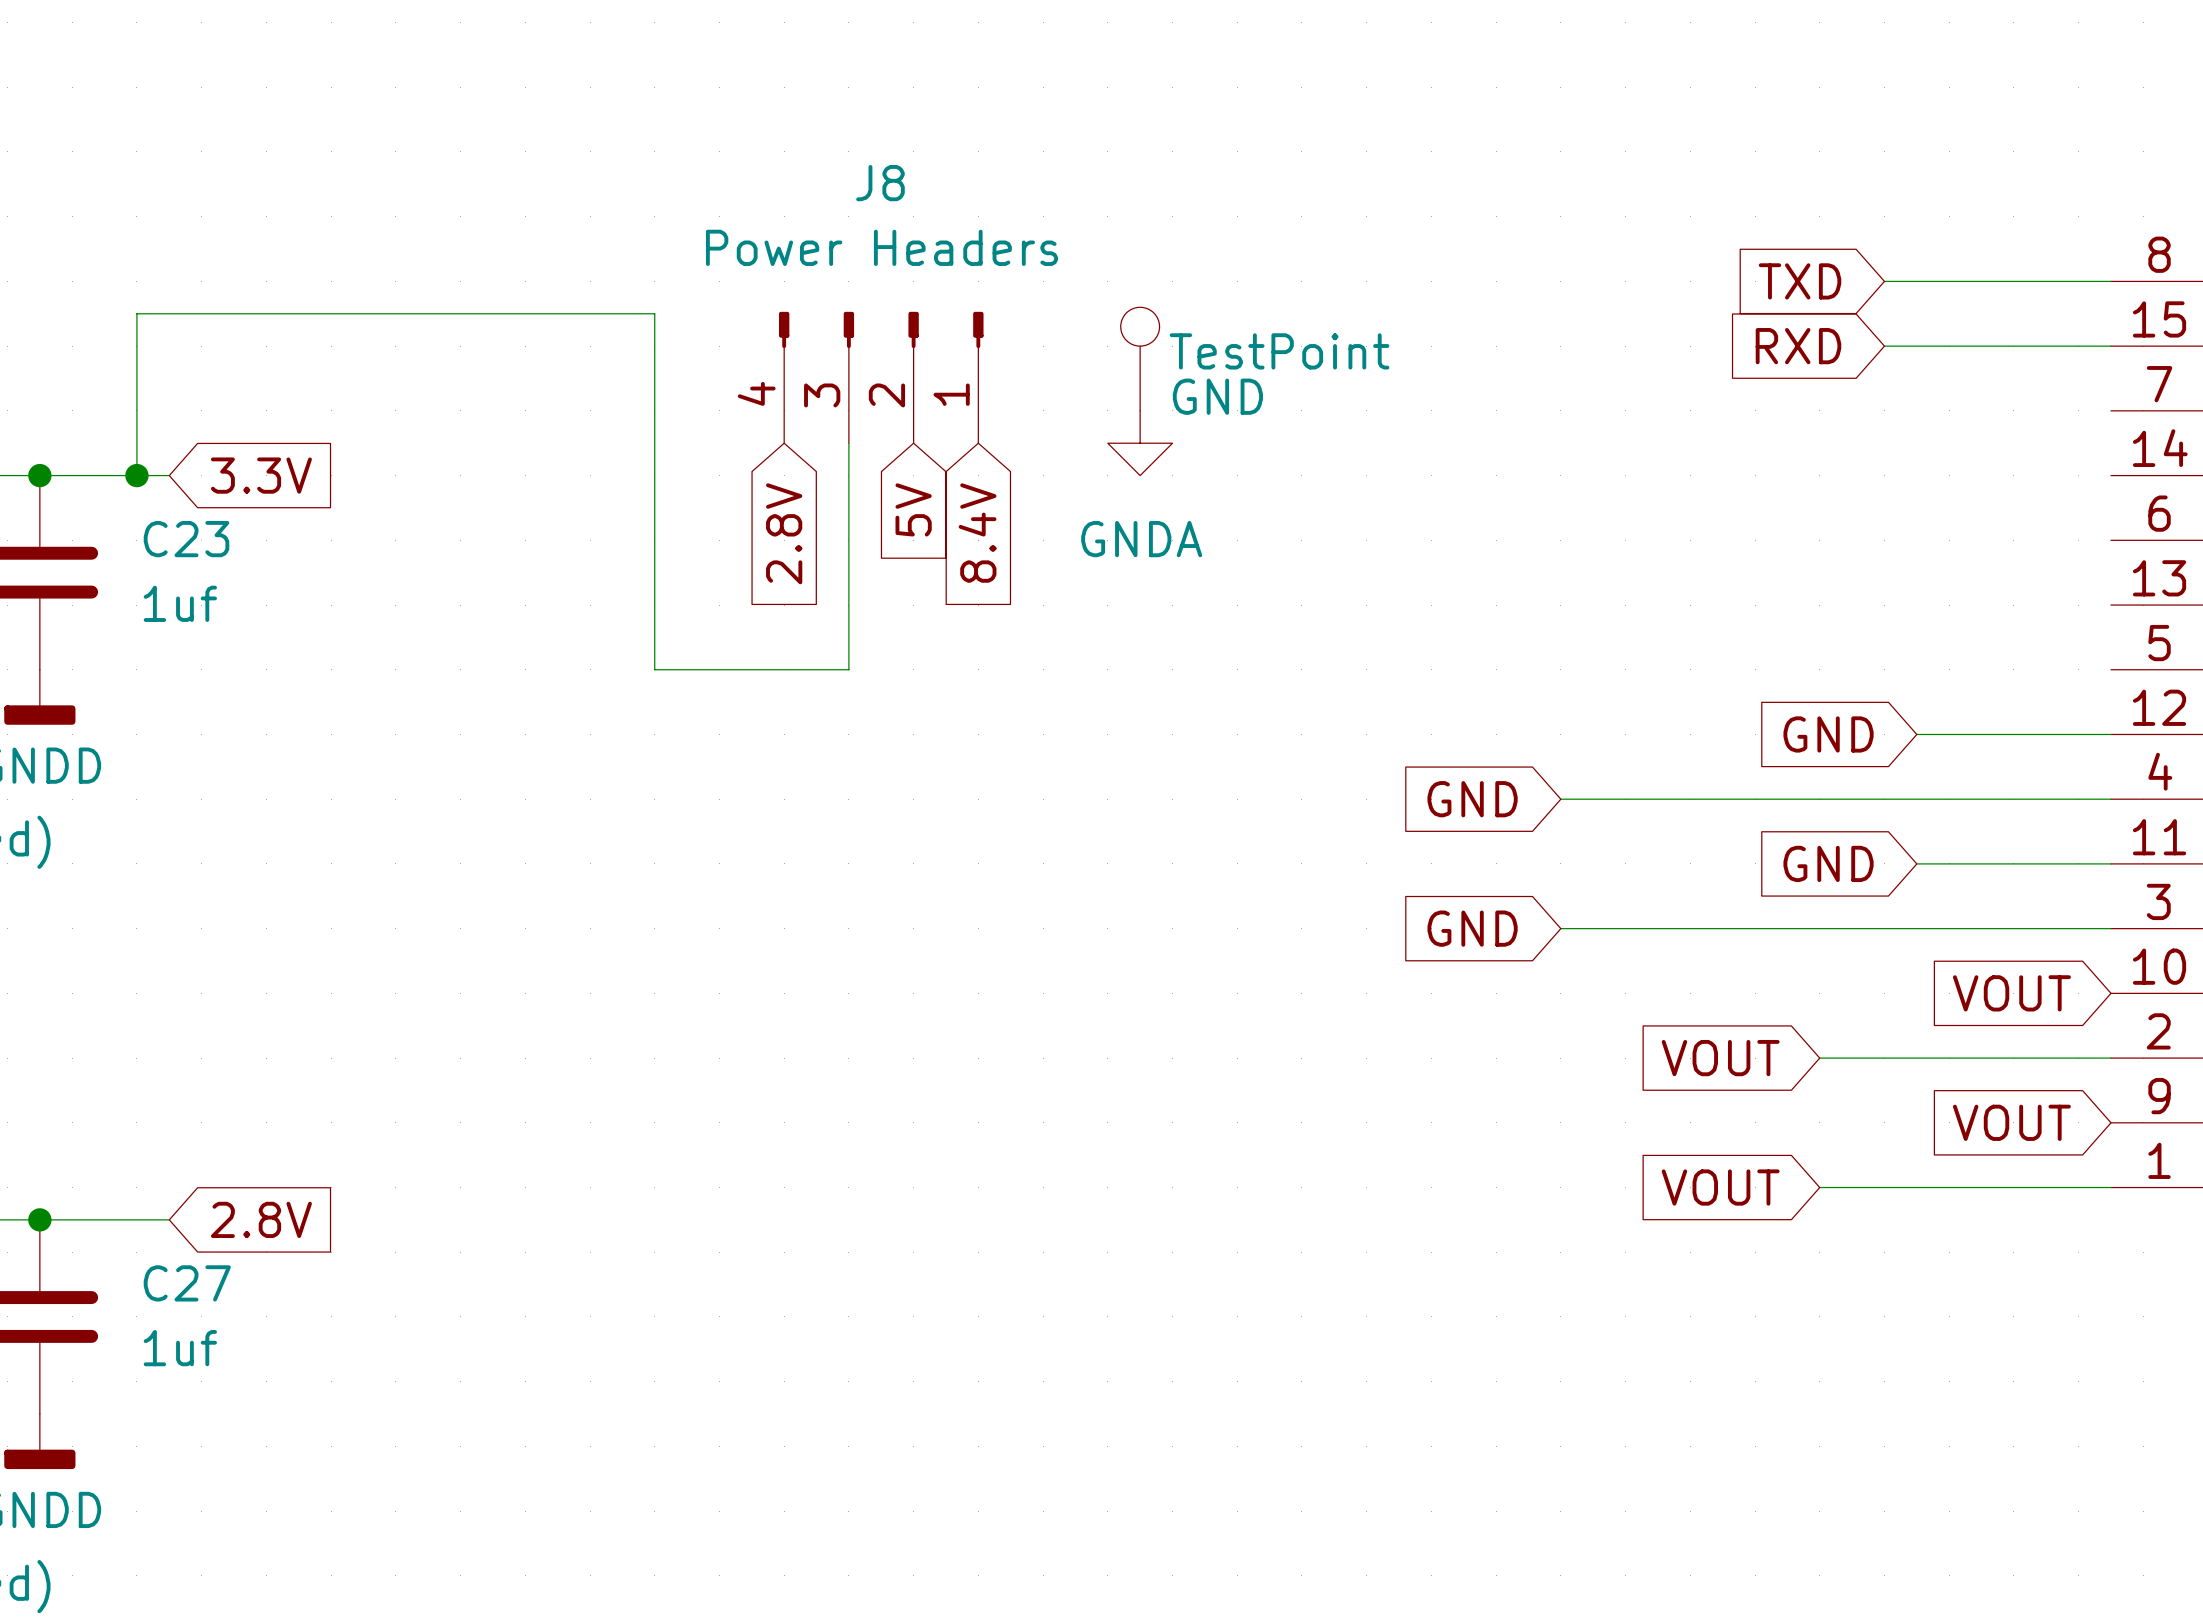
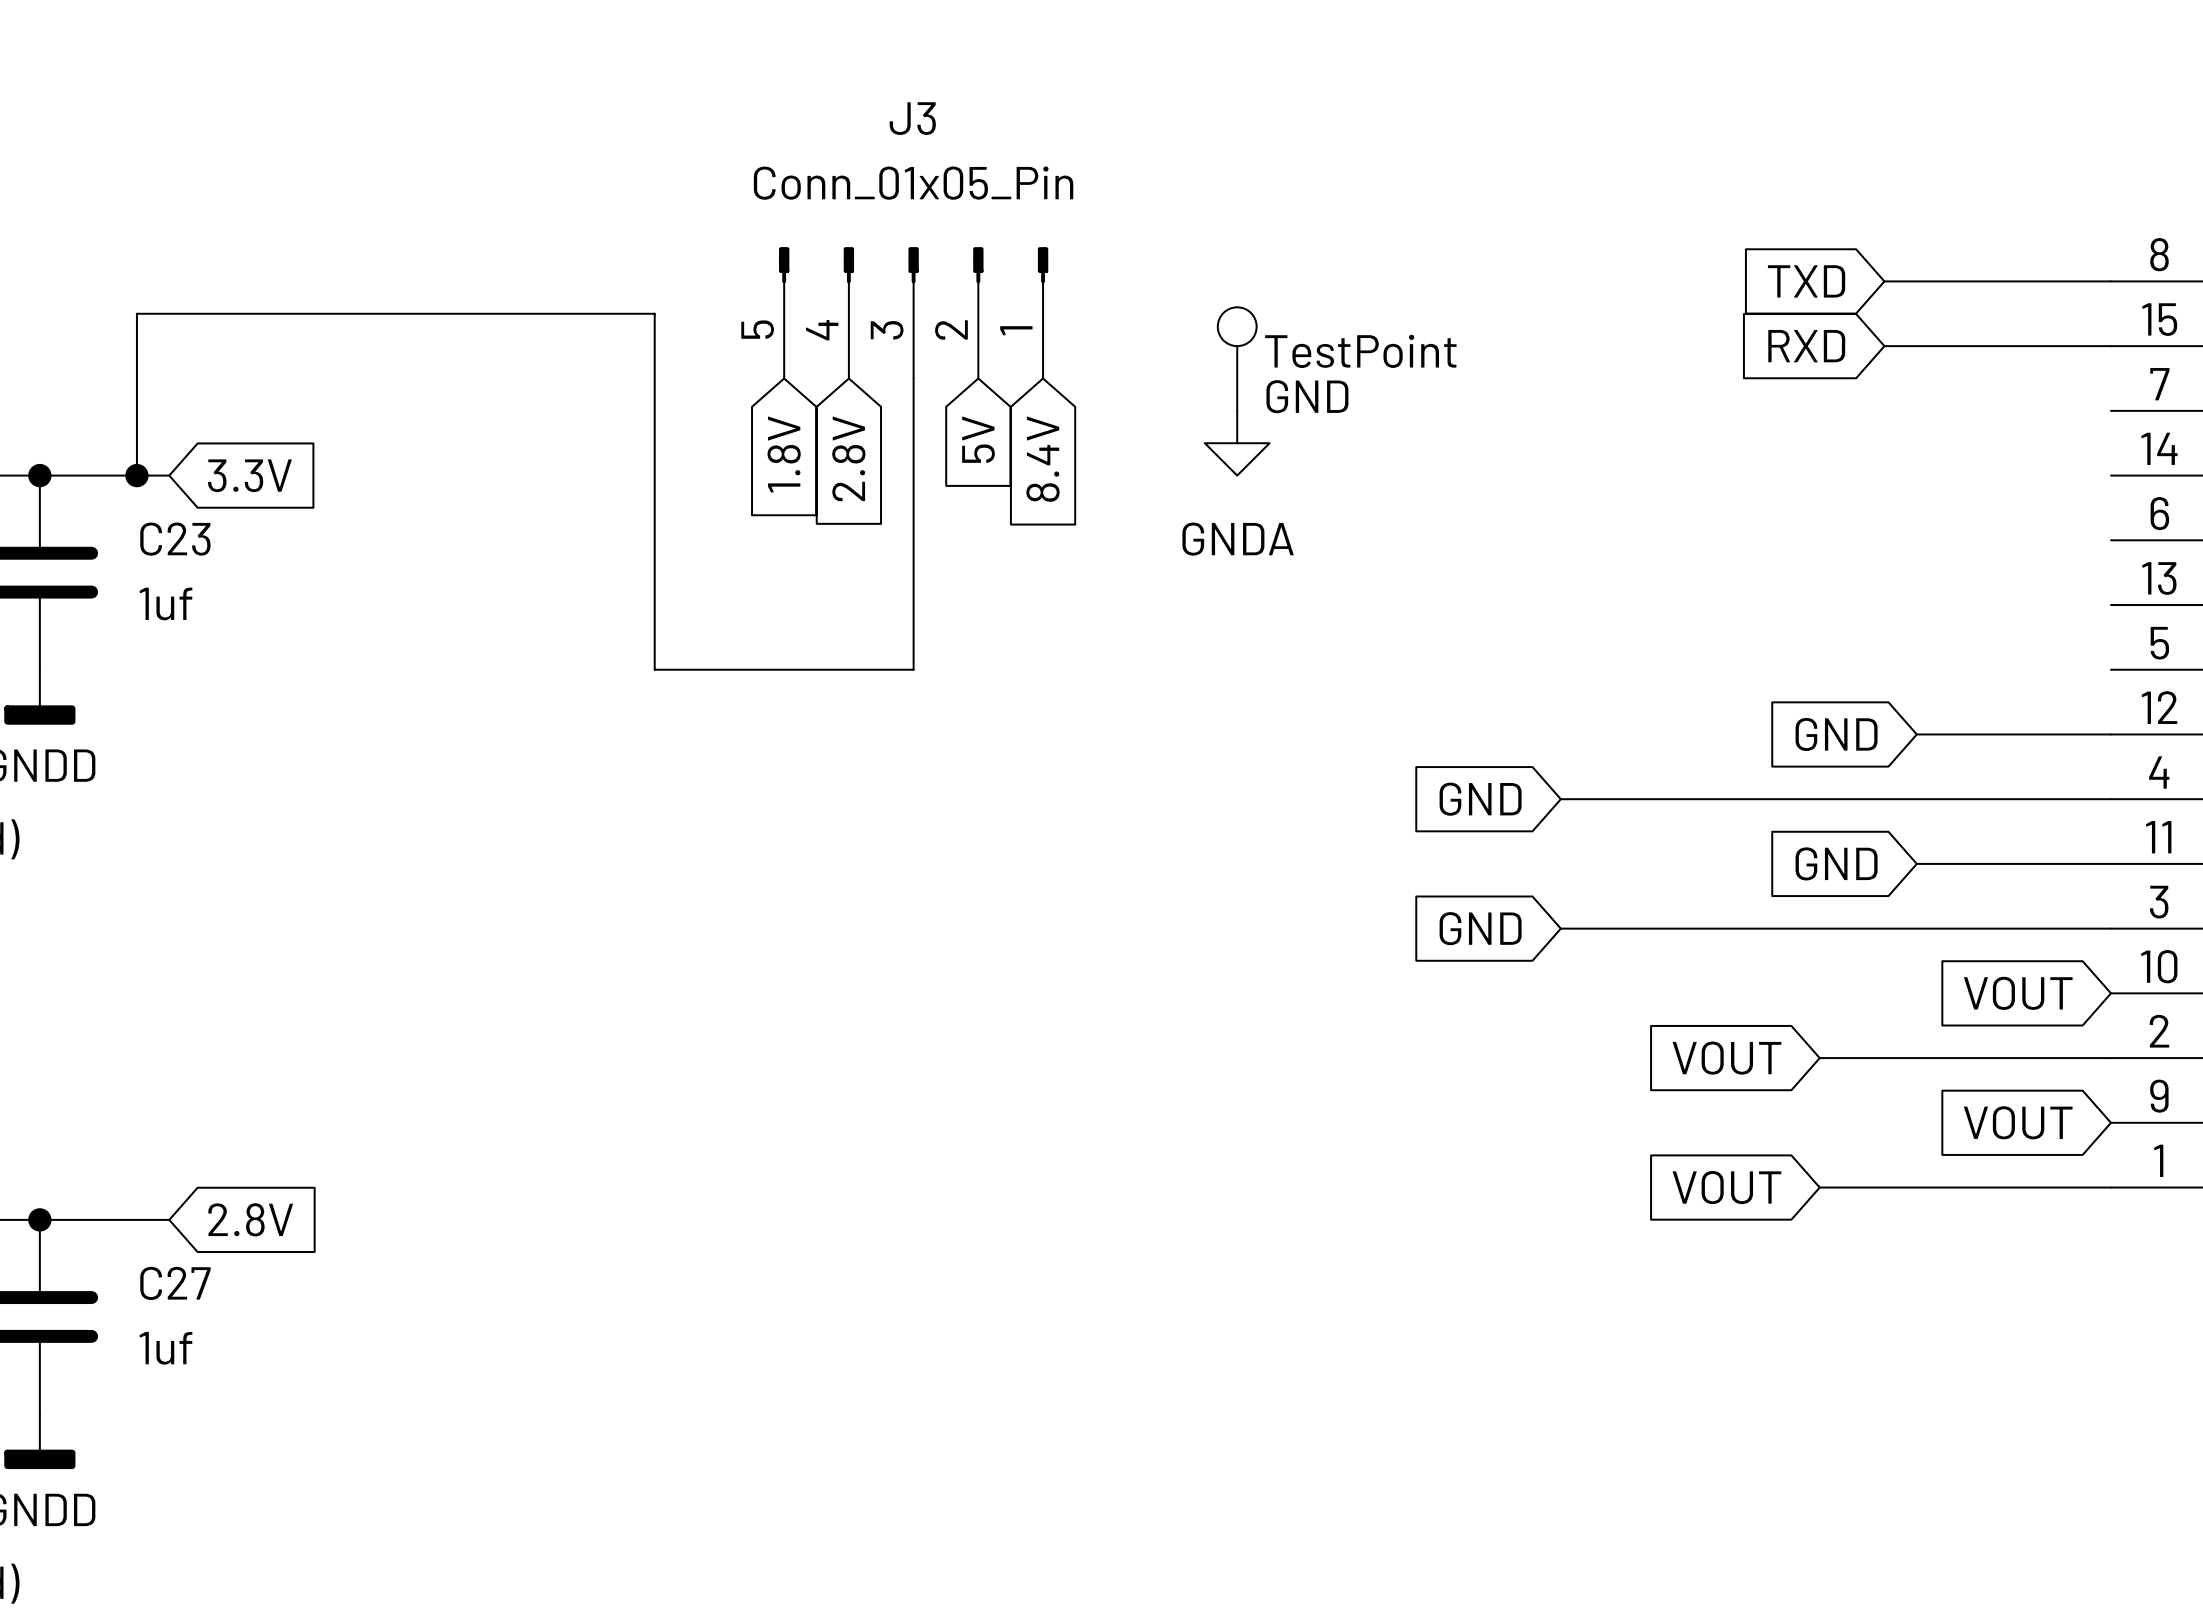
J3: none -> Conn_01x05_Pin (913, 312)
TestPoint position: (1140, 359) -> (1237, 359)
J8: Power Headers (881, 377) -> none
wire: (848, 443) (848, 669) -> (913, 378) (913, 669) (848, 669)
power symbol position: GNDA (1140, 443) -> GNDA (1237, 443)
global label: none -> 1.8V (784, 454)
global label position: 5V (913, 509) -> 5V (978, 439)
global label position: 2.8V (784, 533) -> 2.8V (848, 458)
global label position: 8.4V (977, 533) -> 8.4V (1043, 459)

